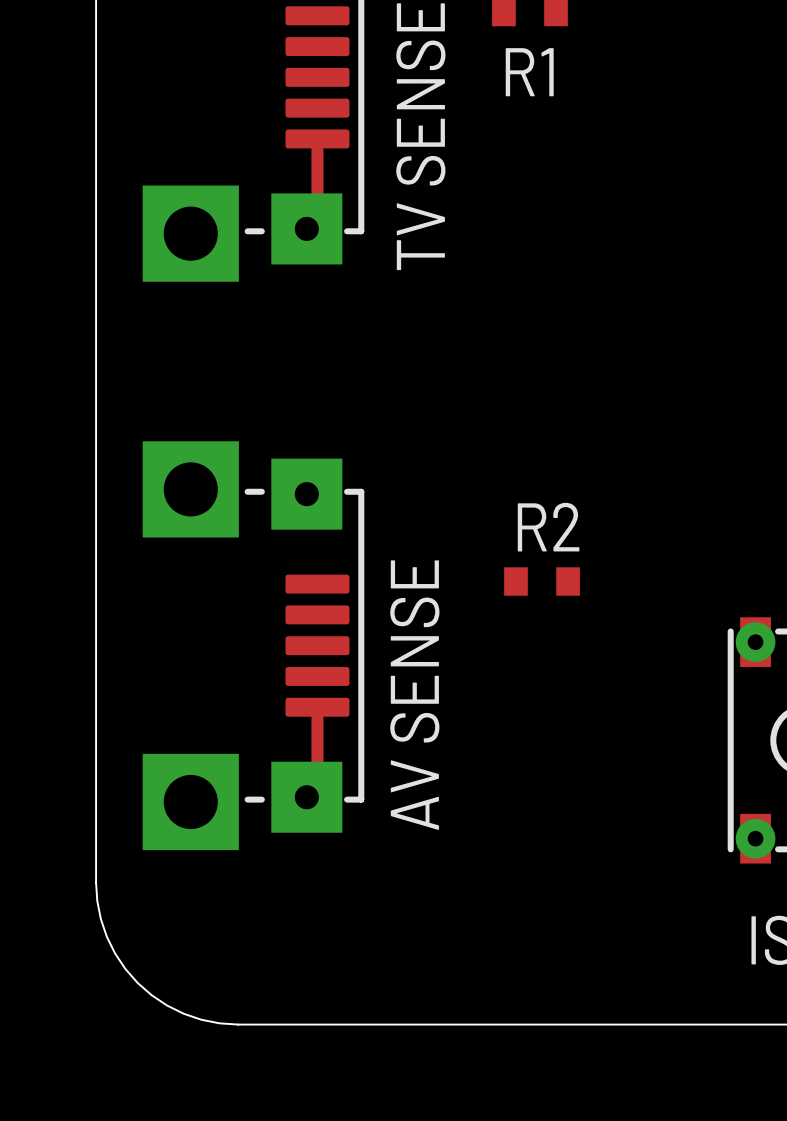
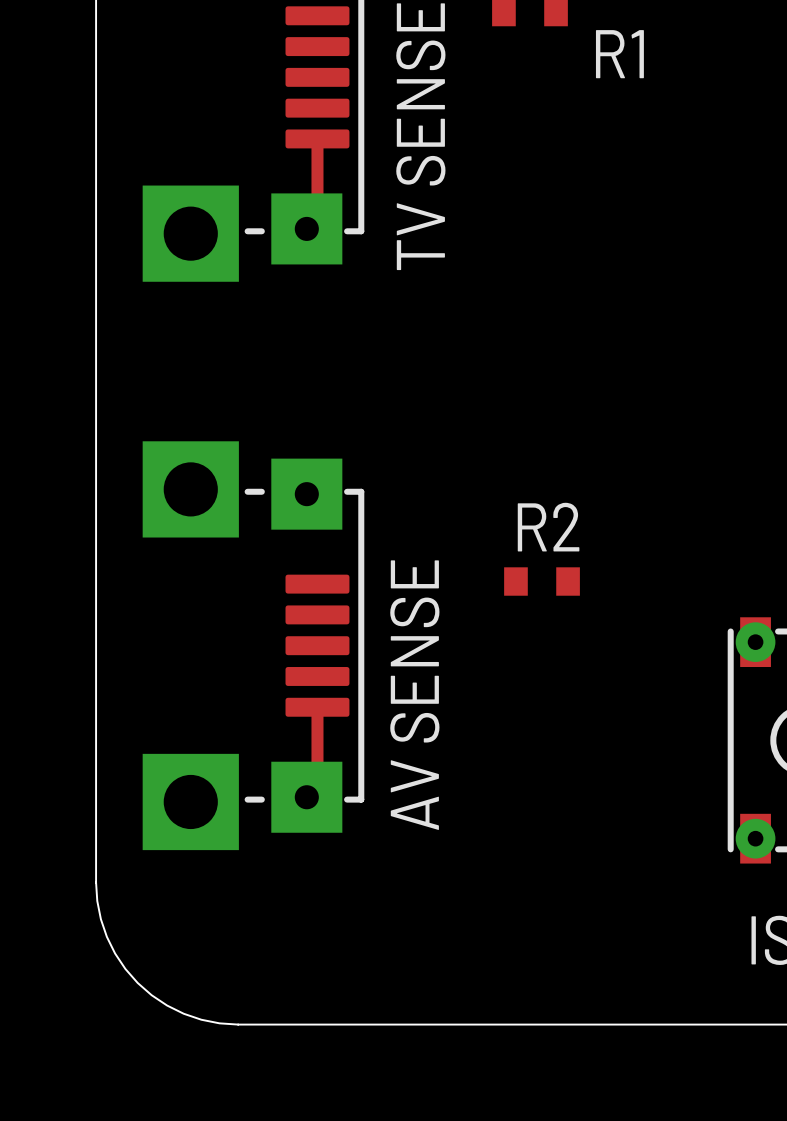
R1 name position: R1 (529, 72) -> R1 (619, 54)

